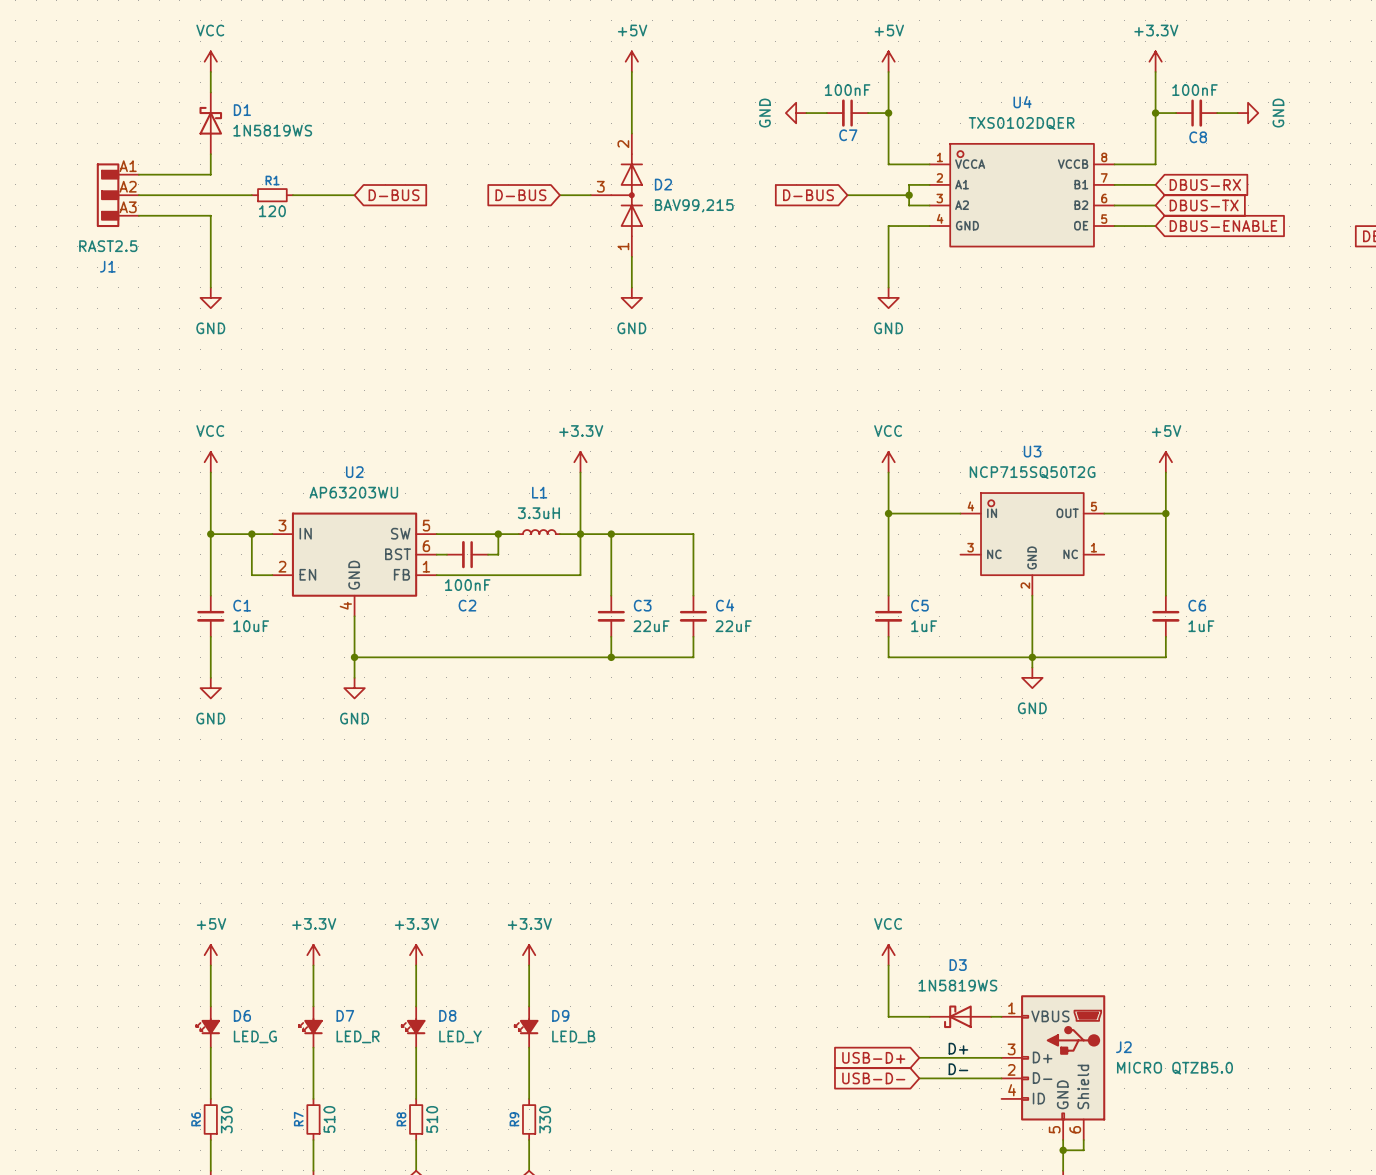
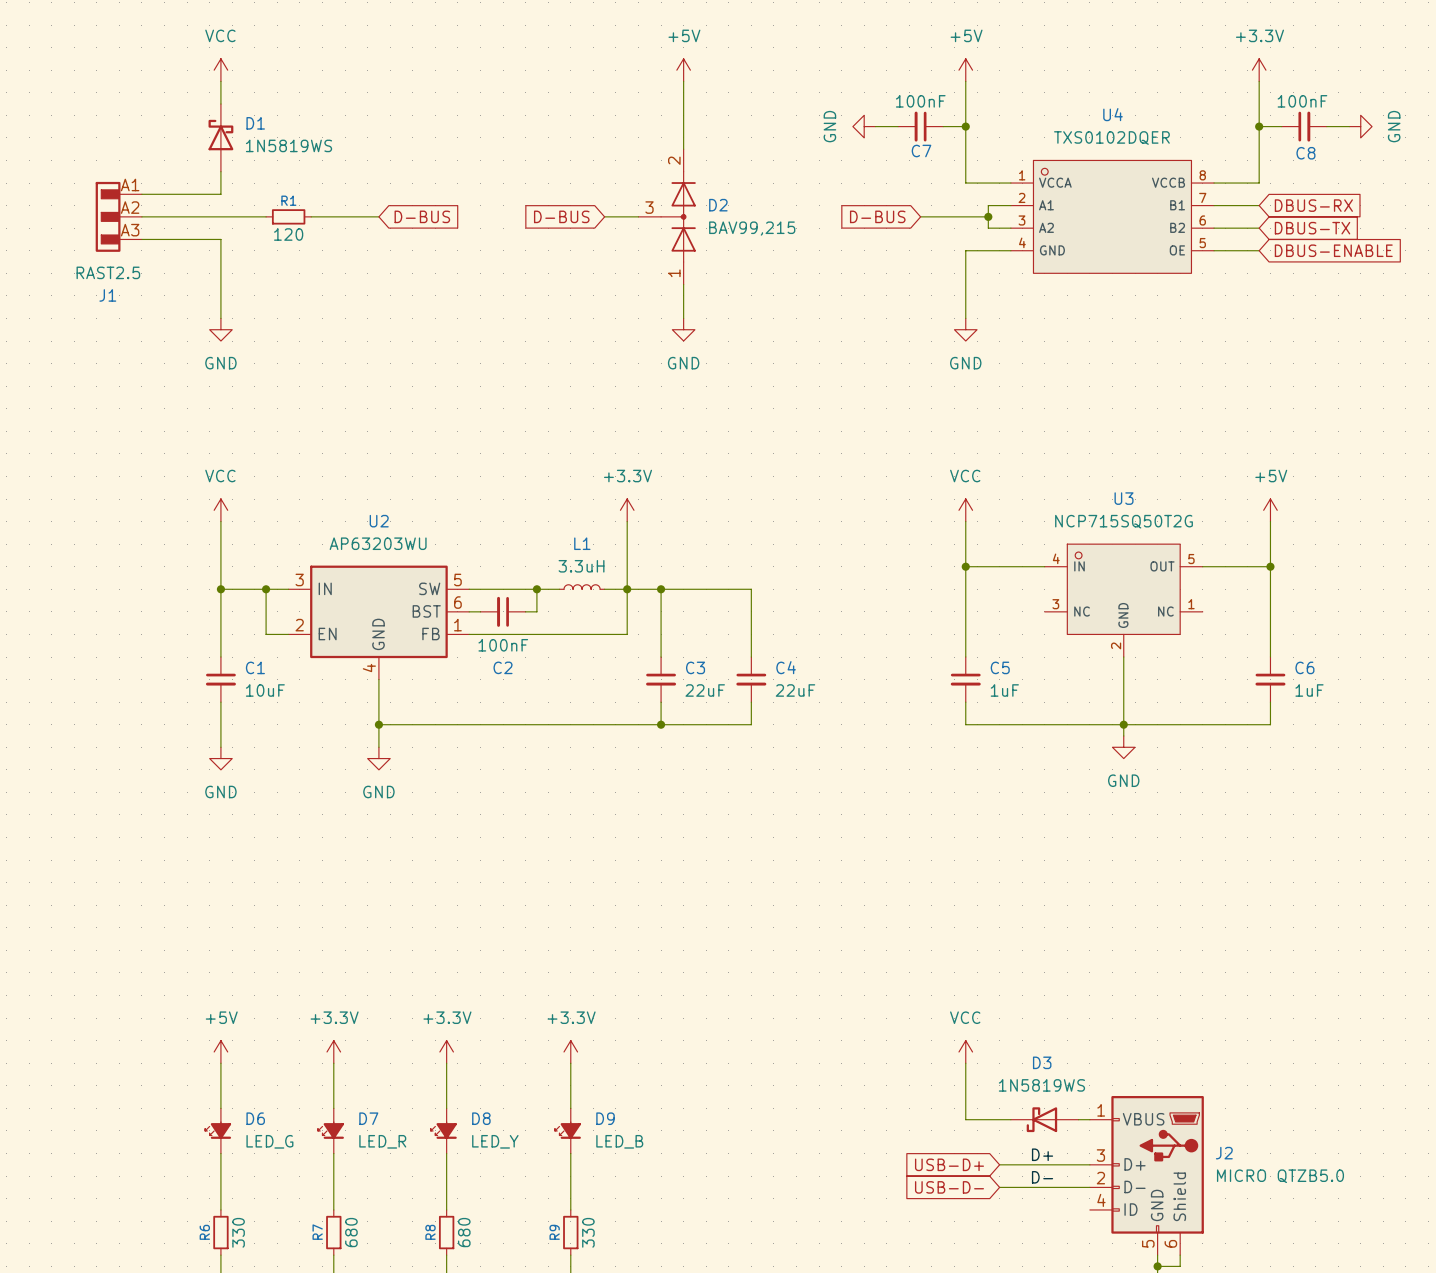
R7 value: 510 (329, 1119) -> 680 (351, 1232)
R8 value: 510 (432, 1119) -> 680 (464, 1232)

